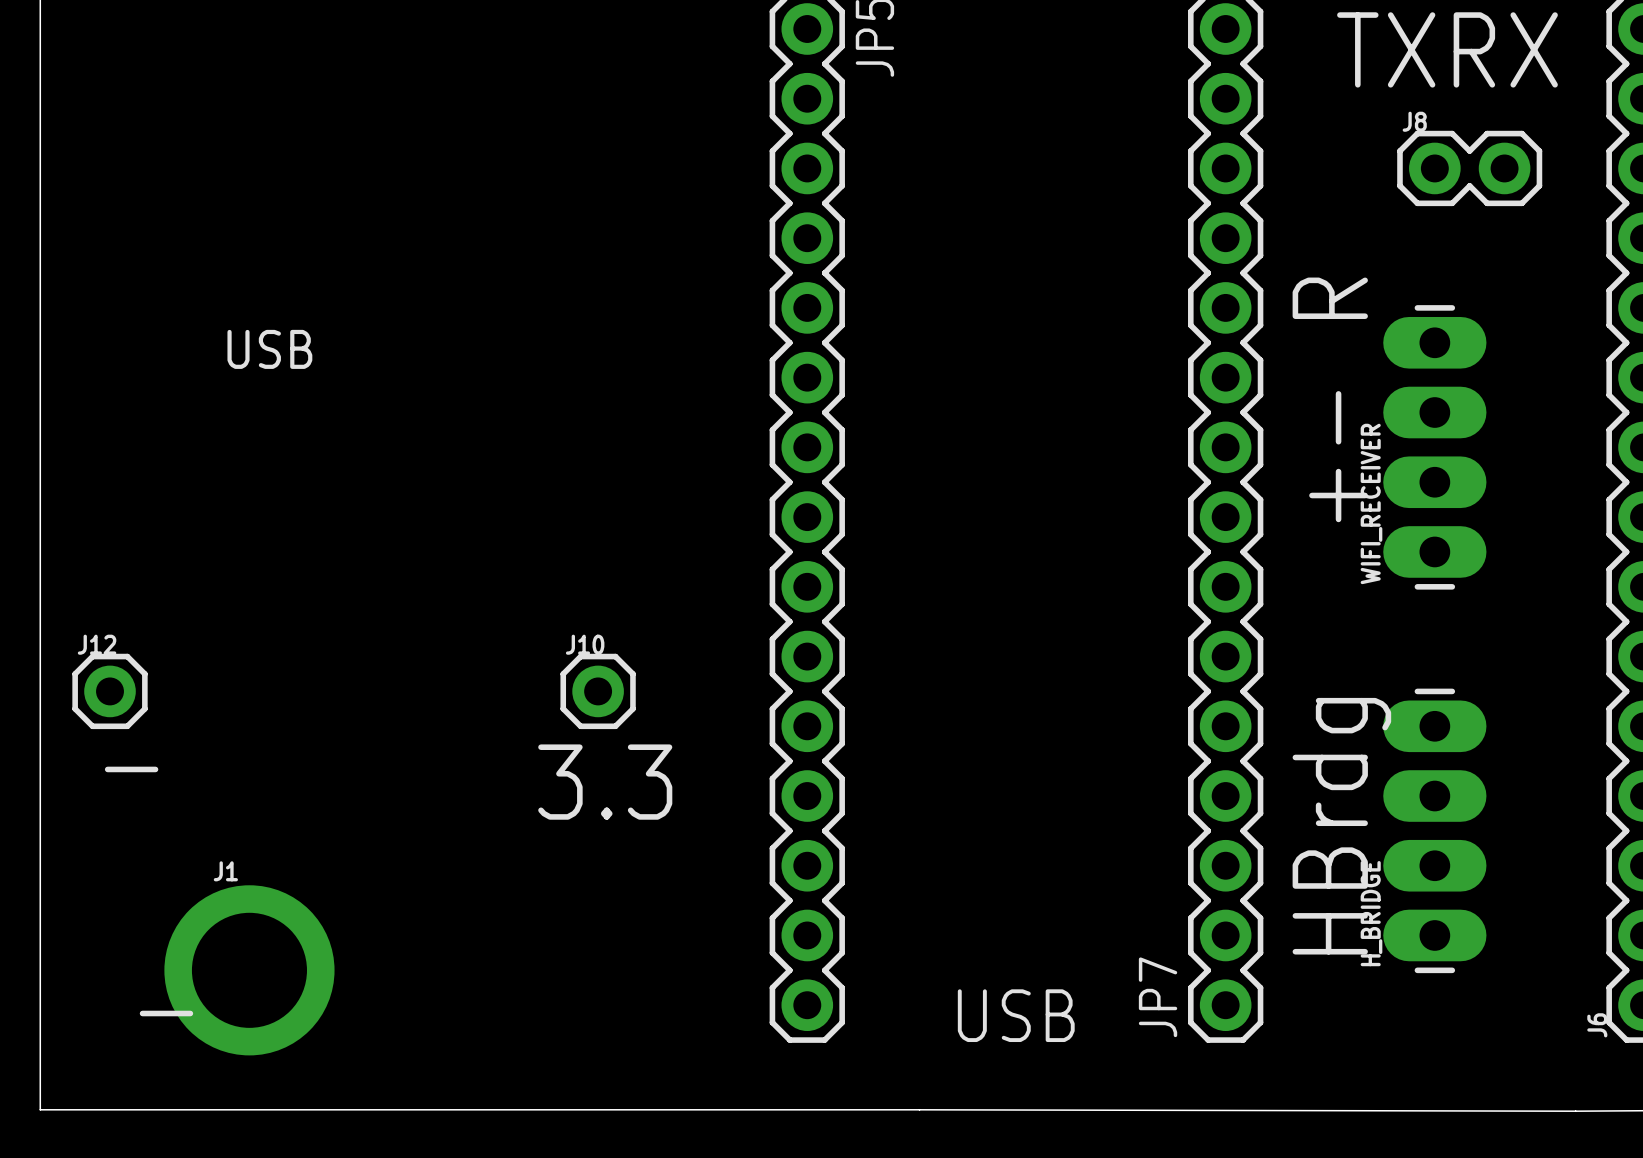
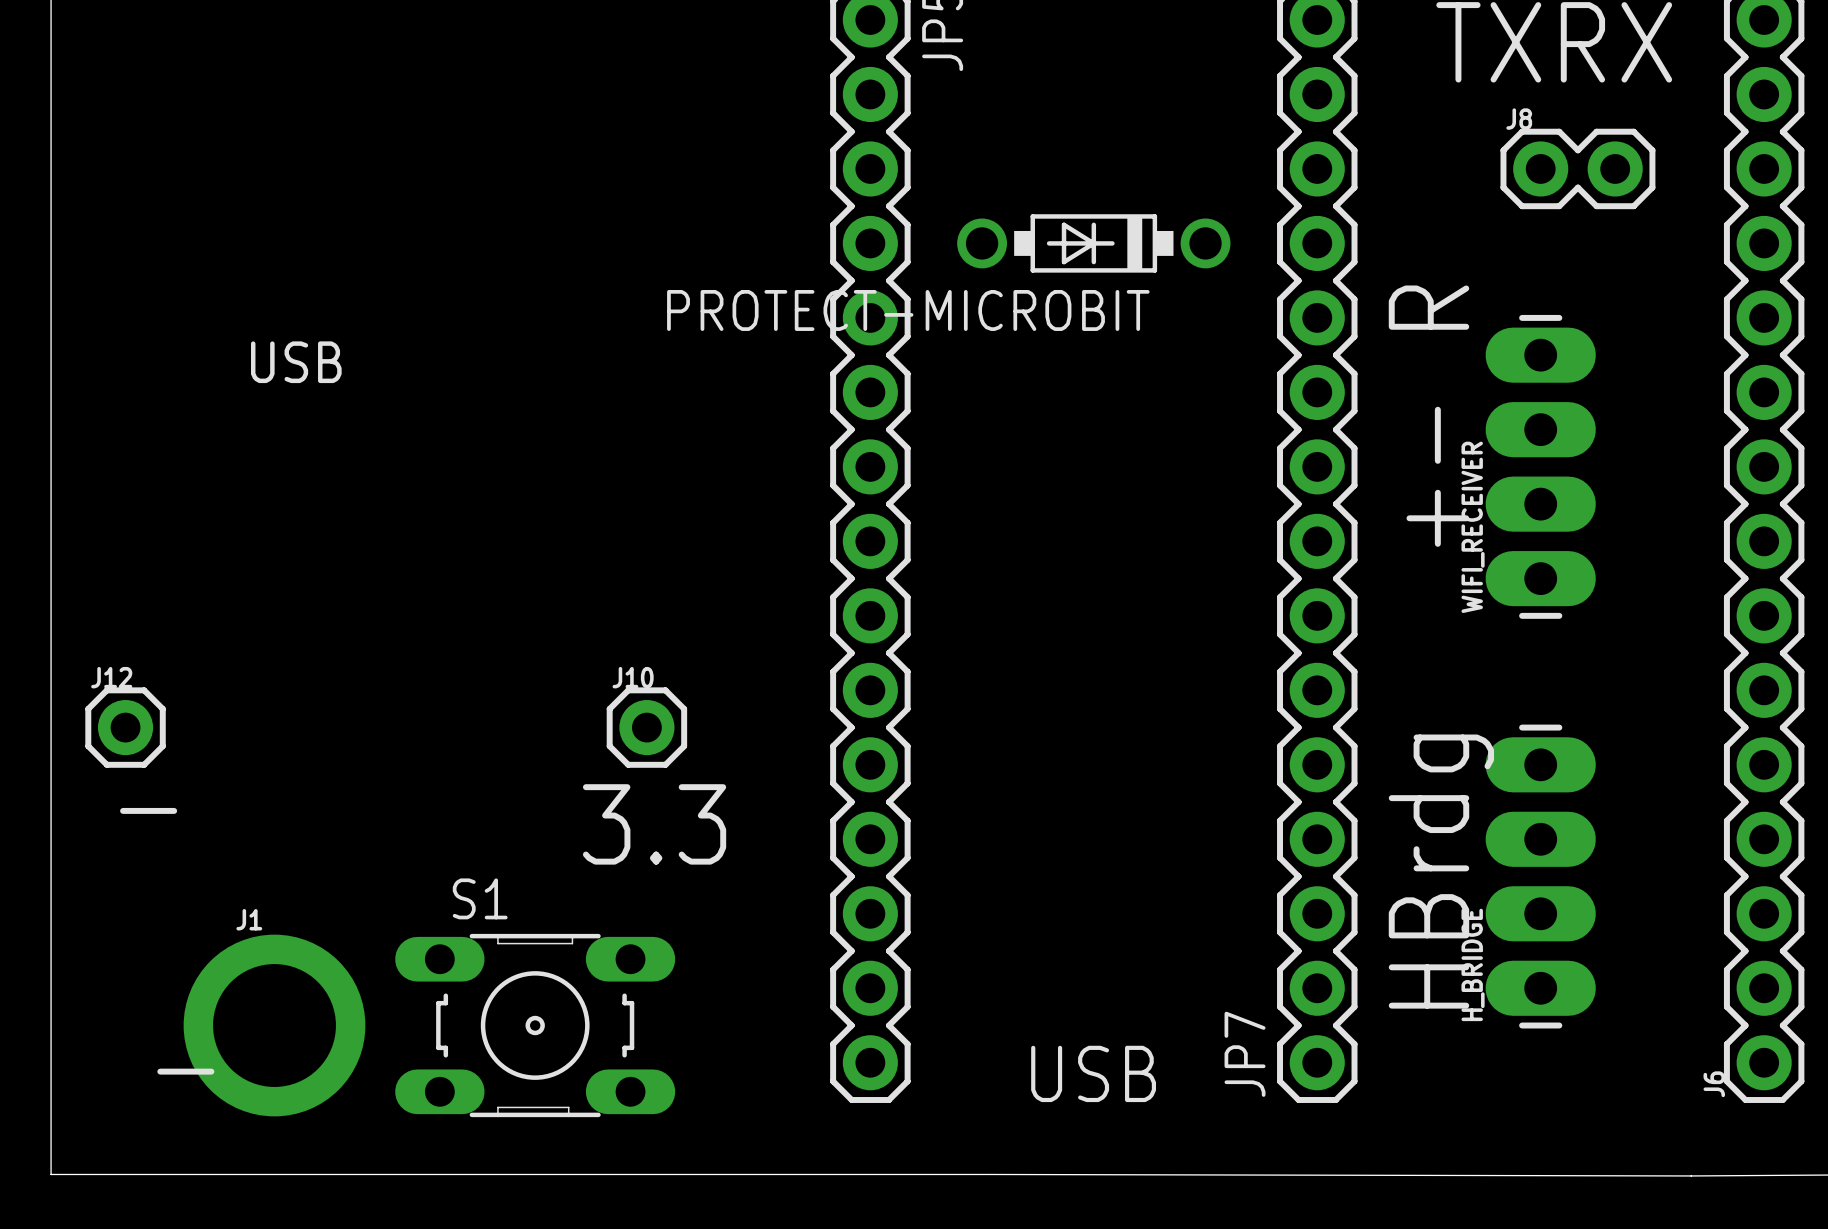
PROTECT-MICROBIT: none -> (1093, 243)
S1: none -> (535, 1025)

